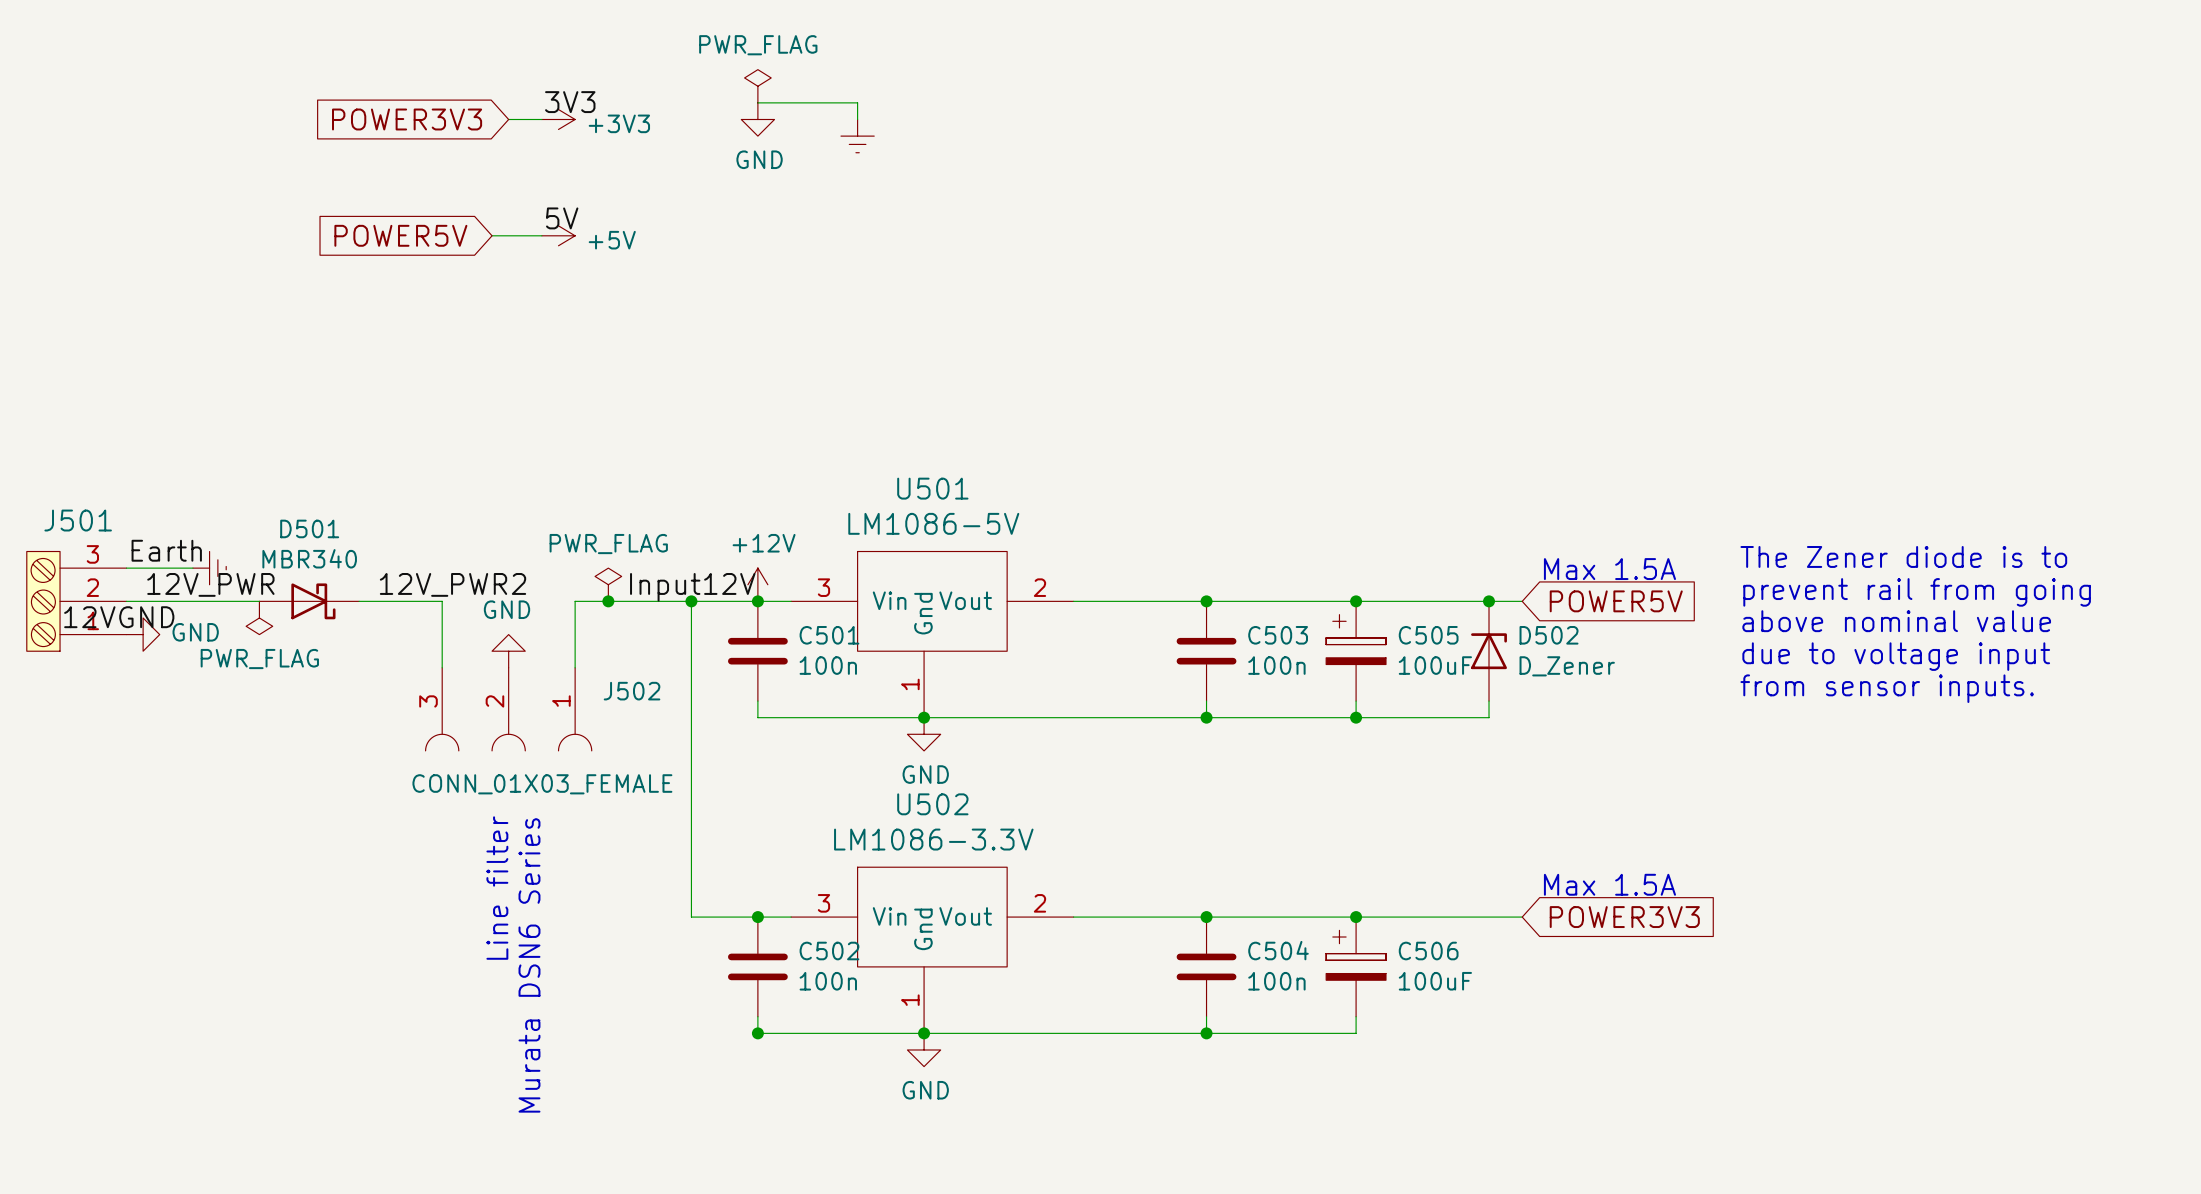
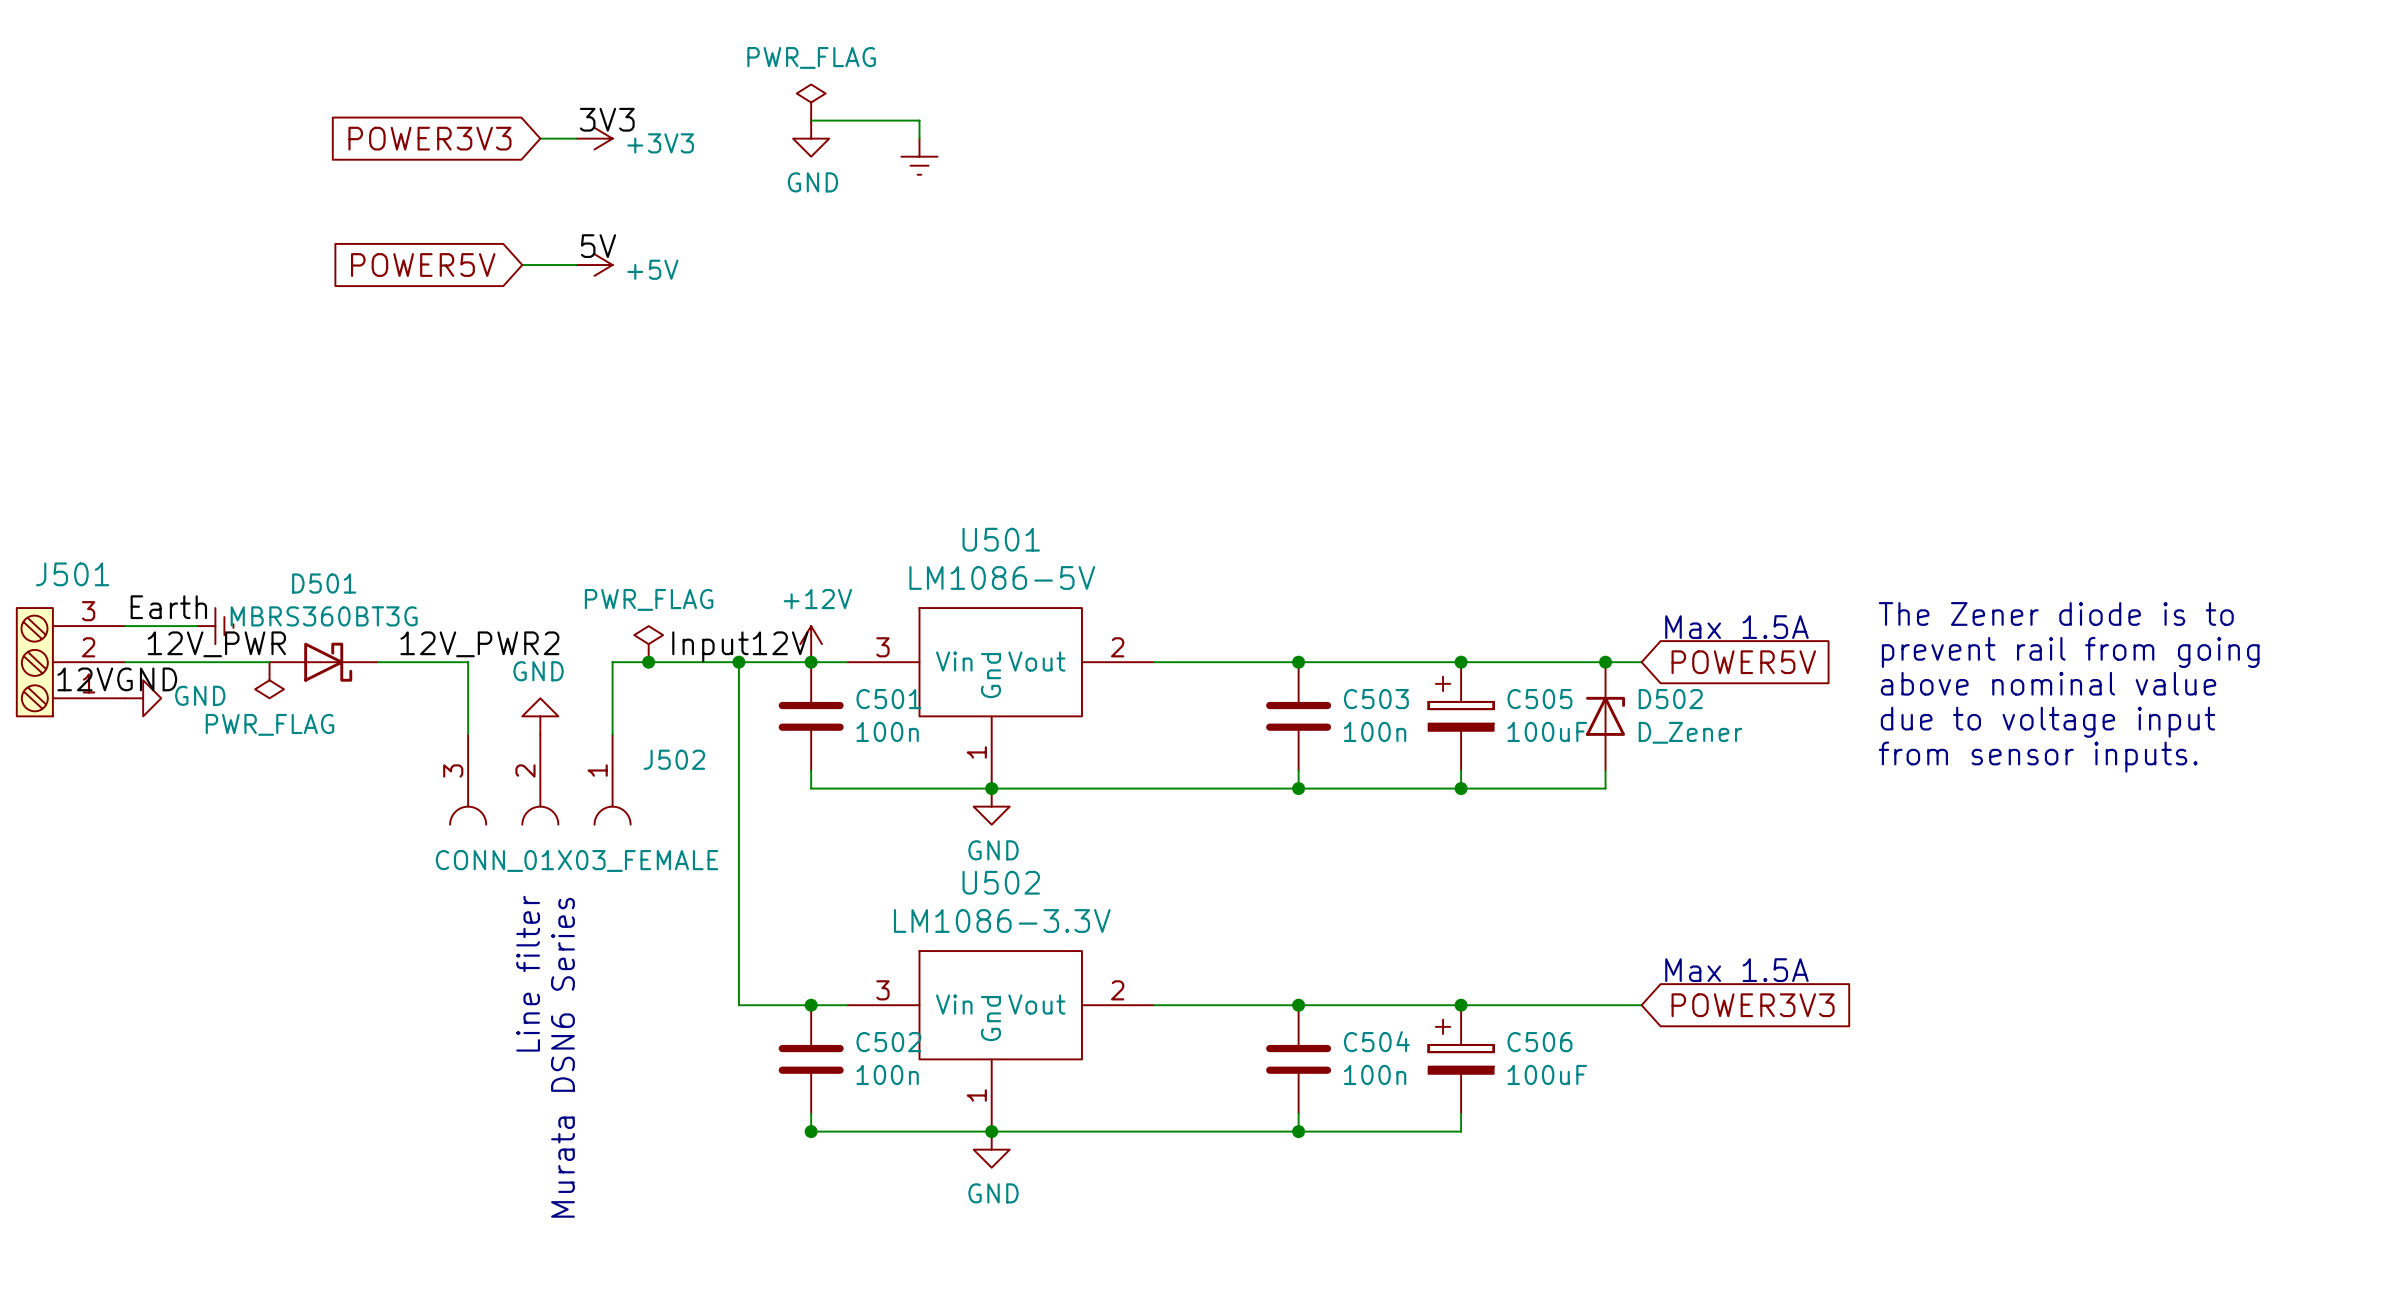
D501 value: MBR340 (309, 558) -> MBRS360BT3G (324, 616)

